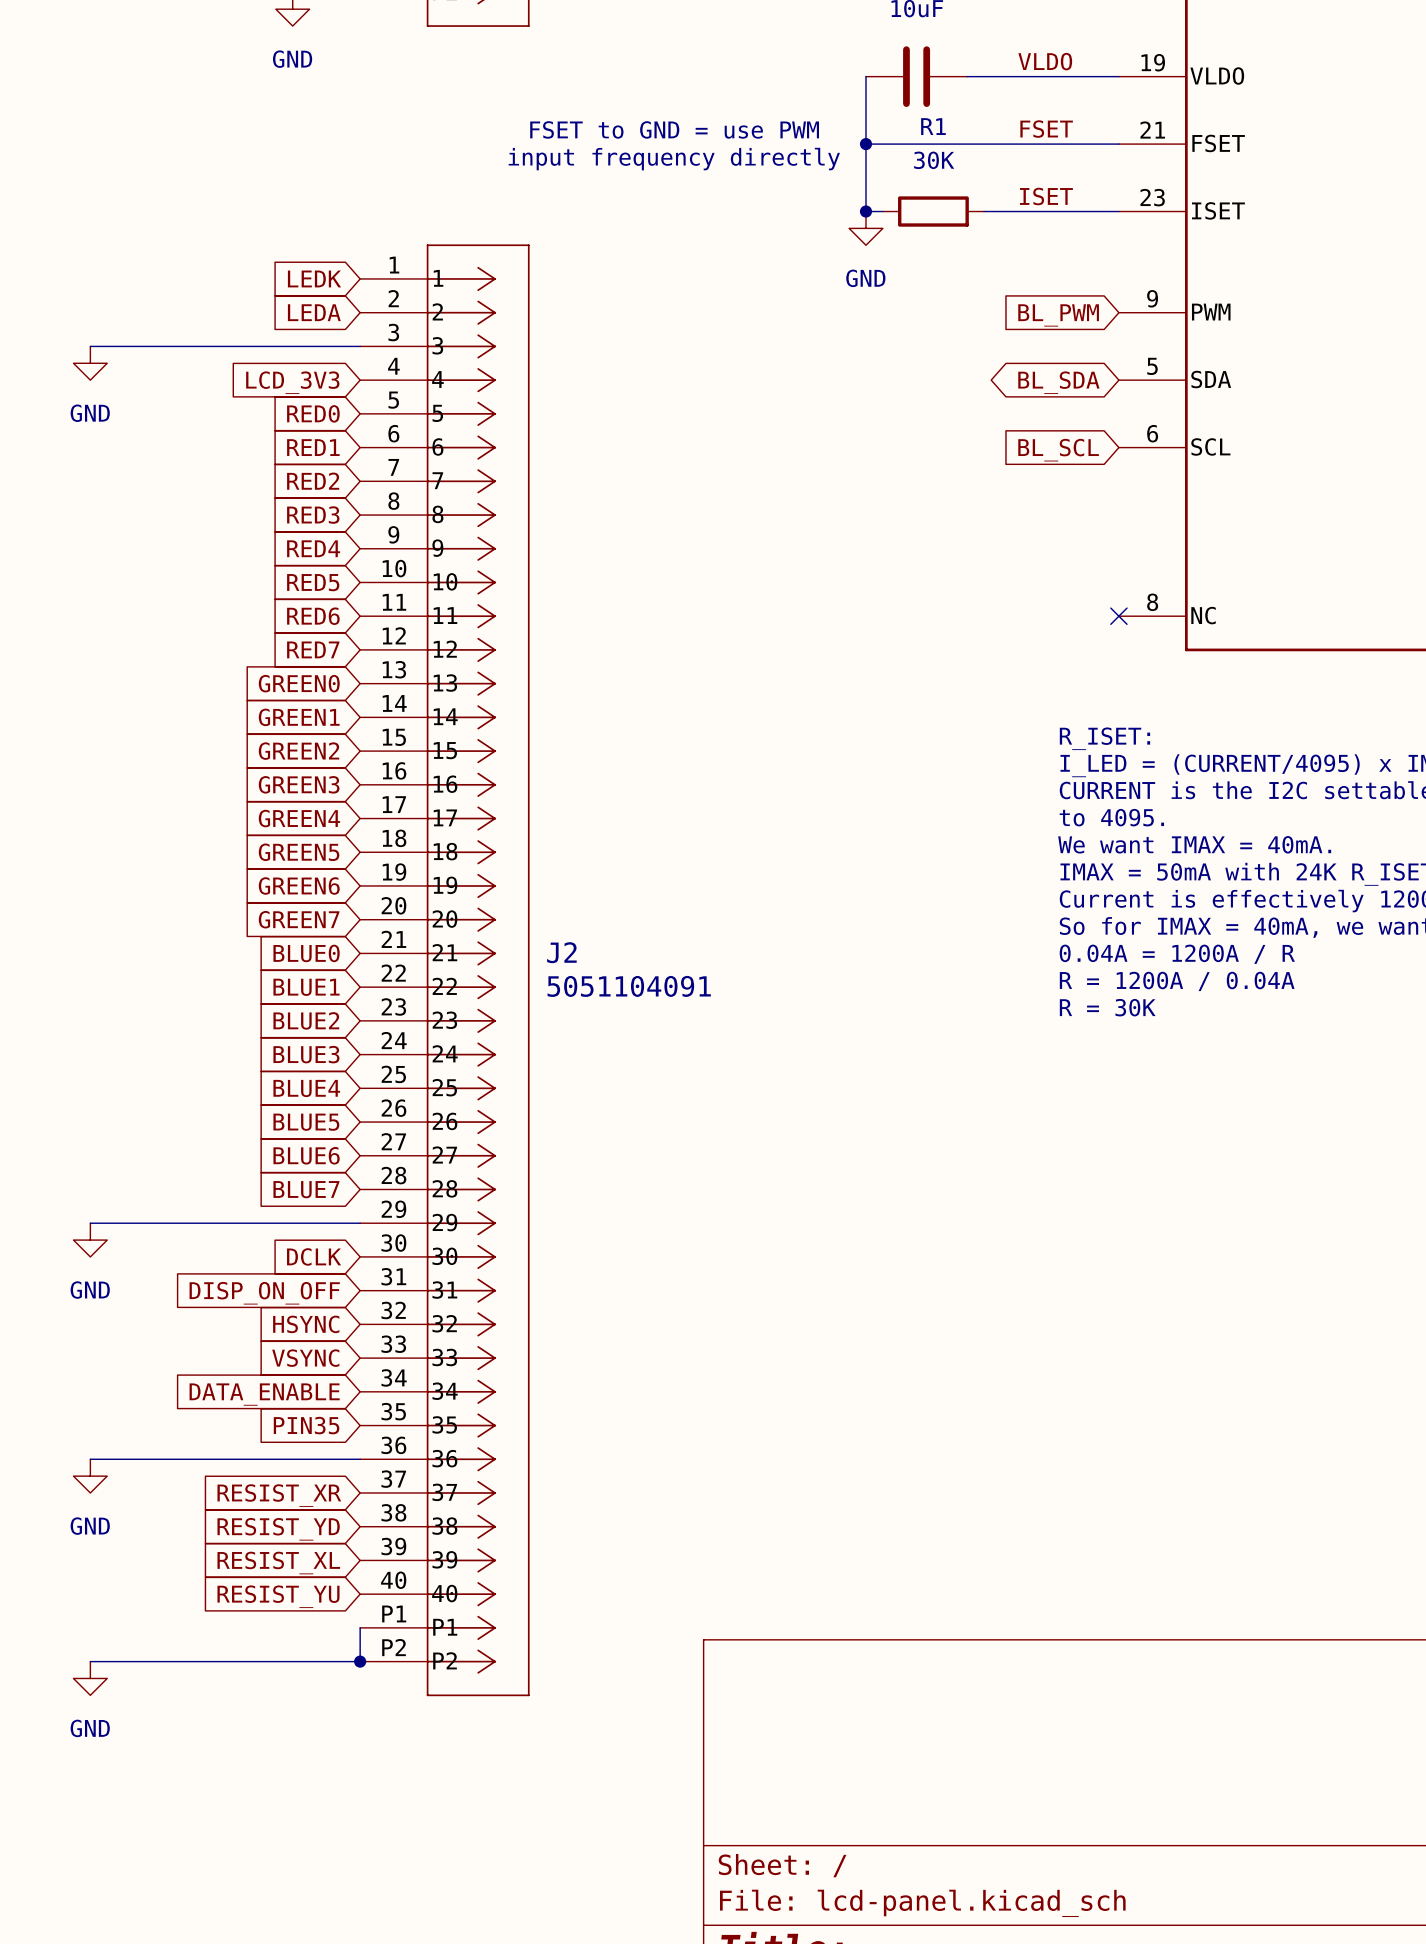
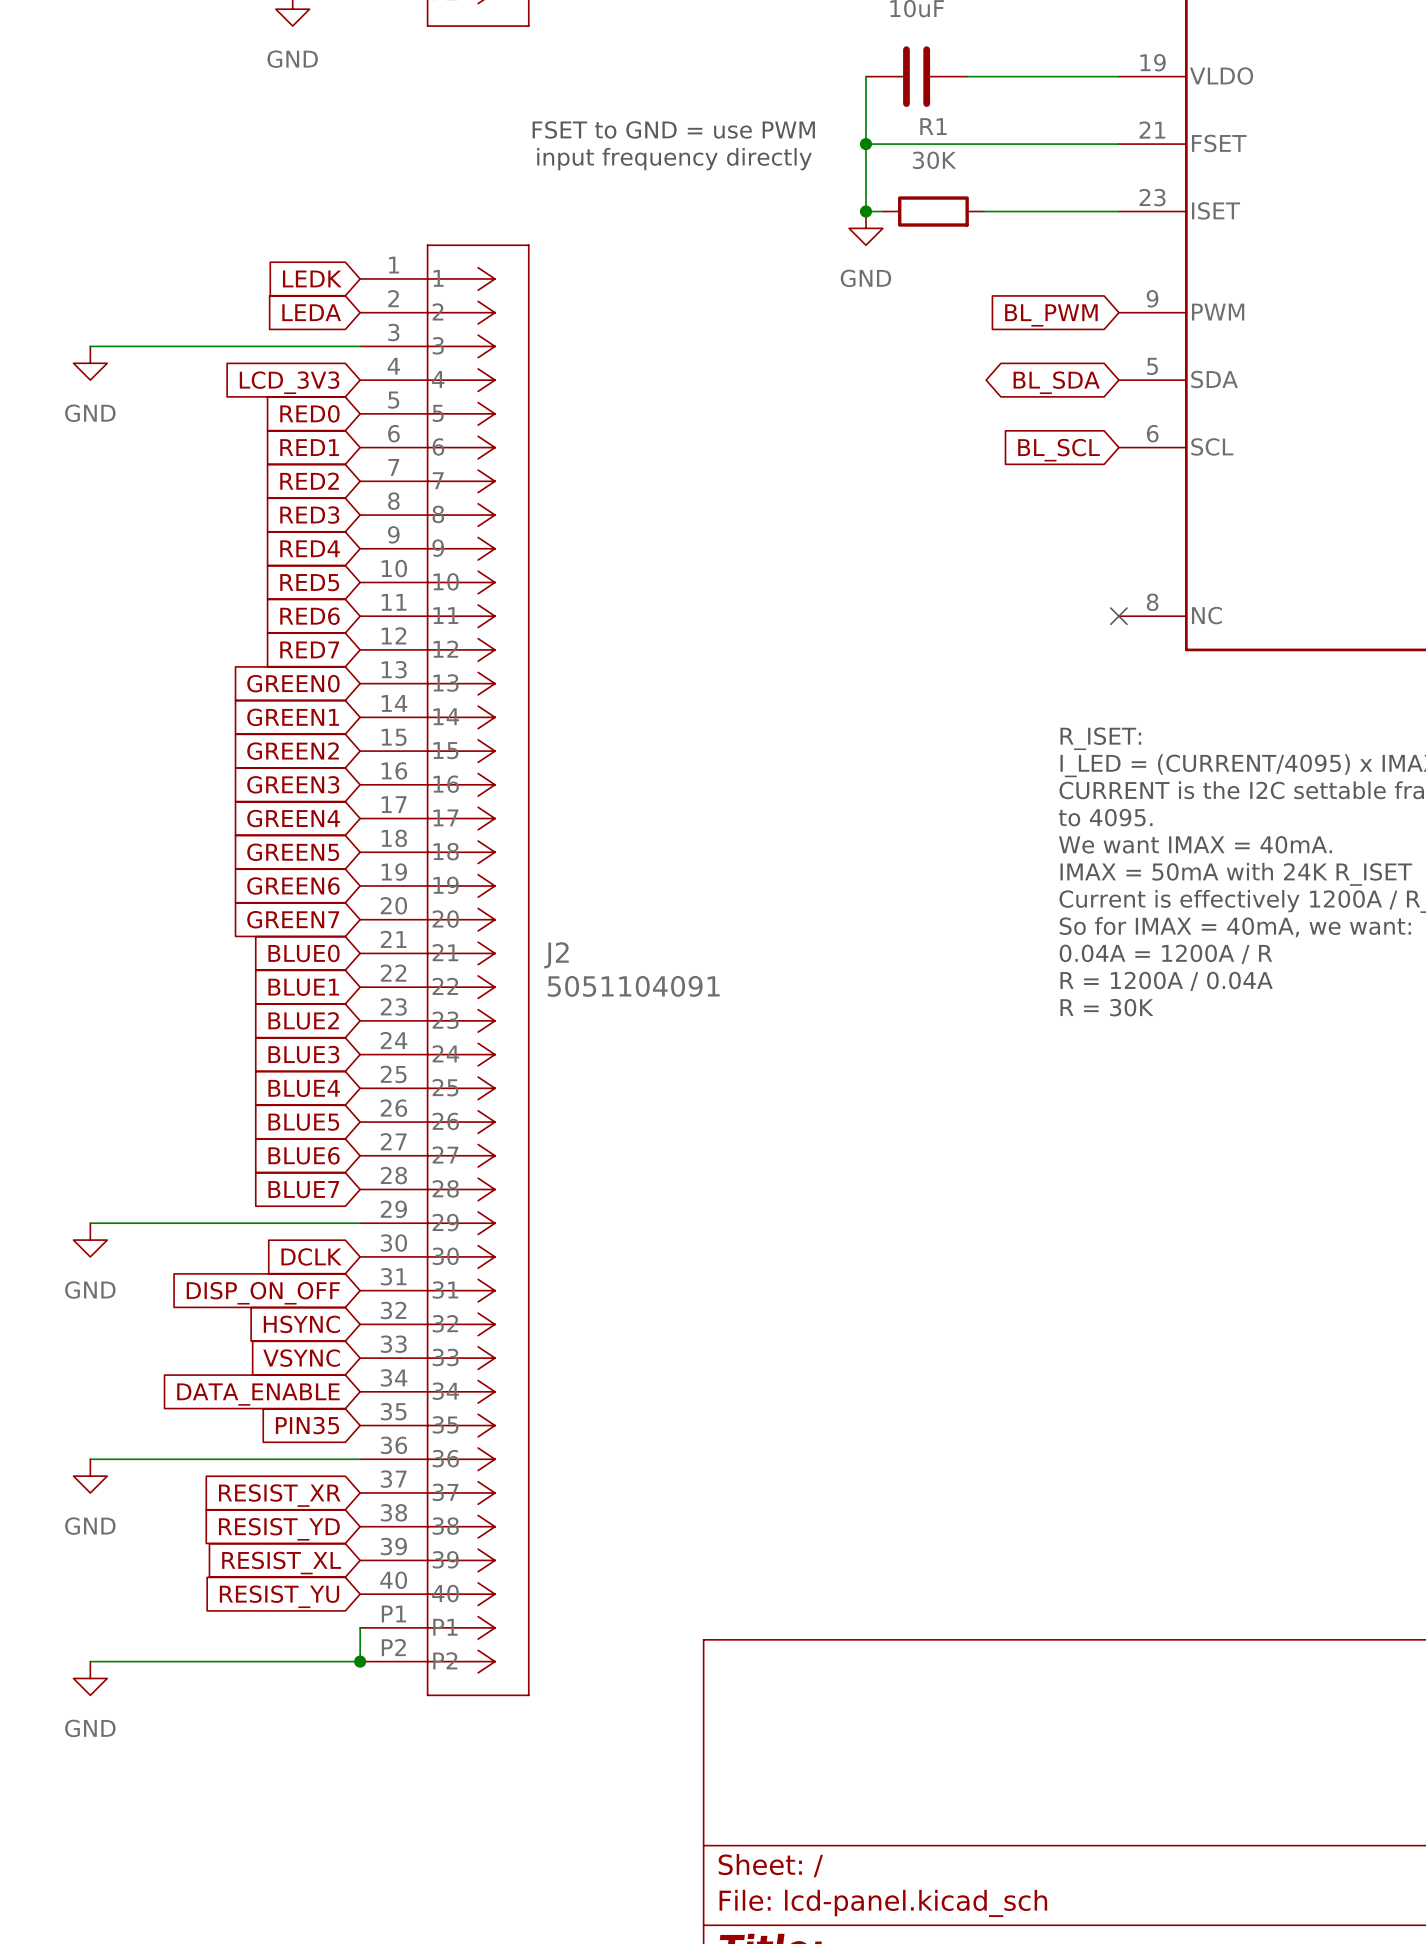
label: VLDO (1045, 61) -> none
label: FSET (1046, 129) -> none
label: ISET (1046, 196) -> none

